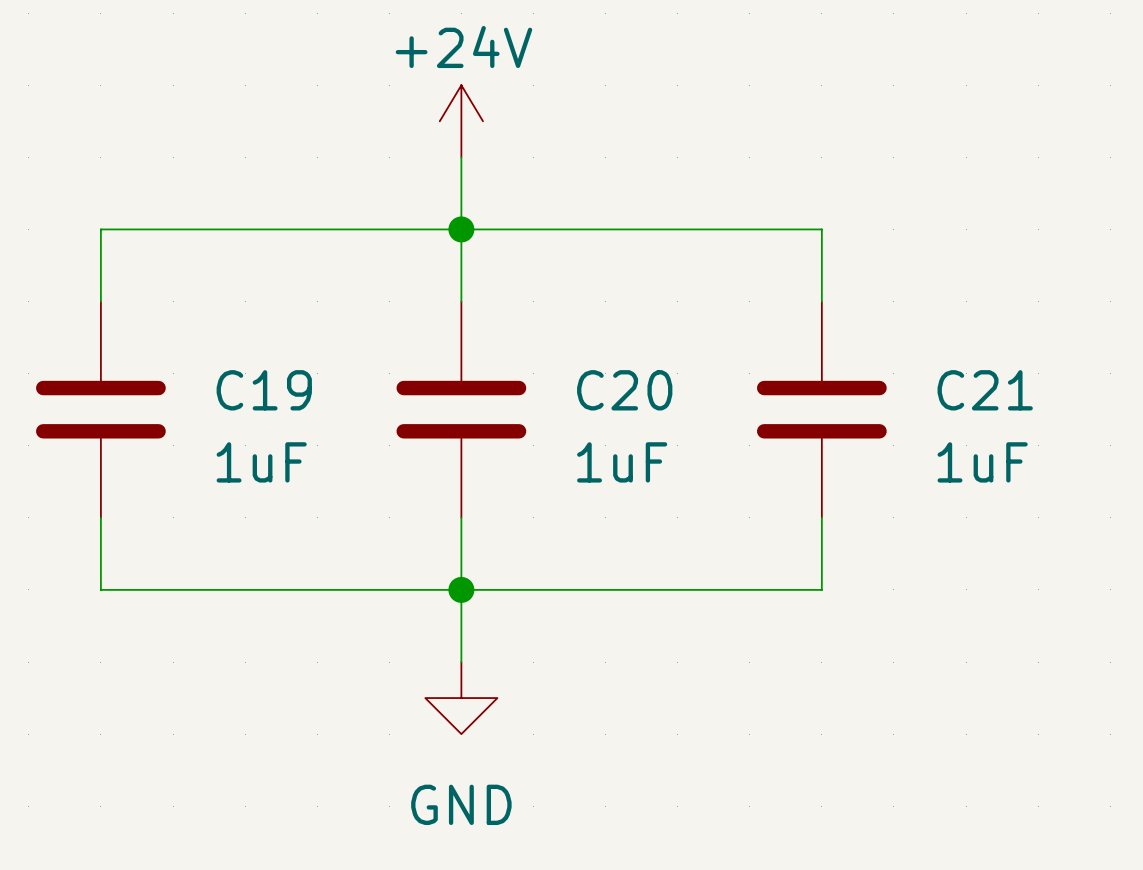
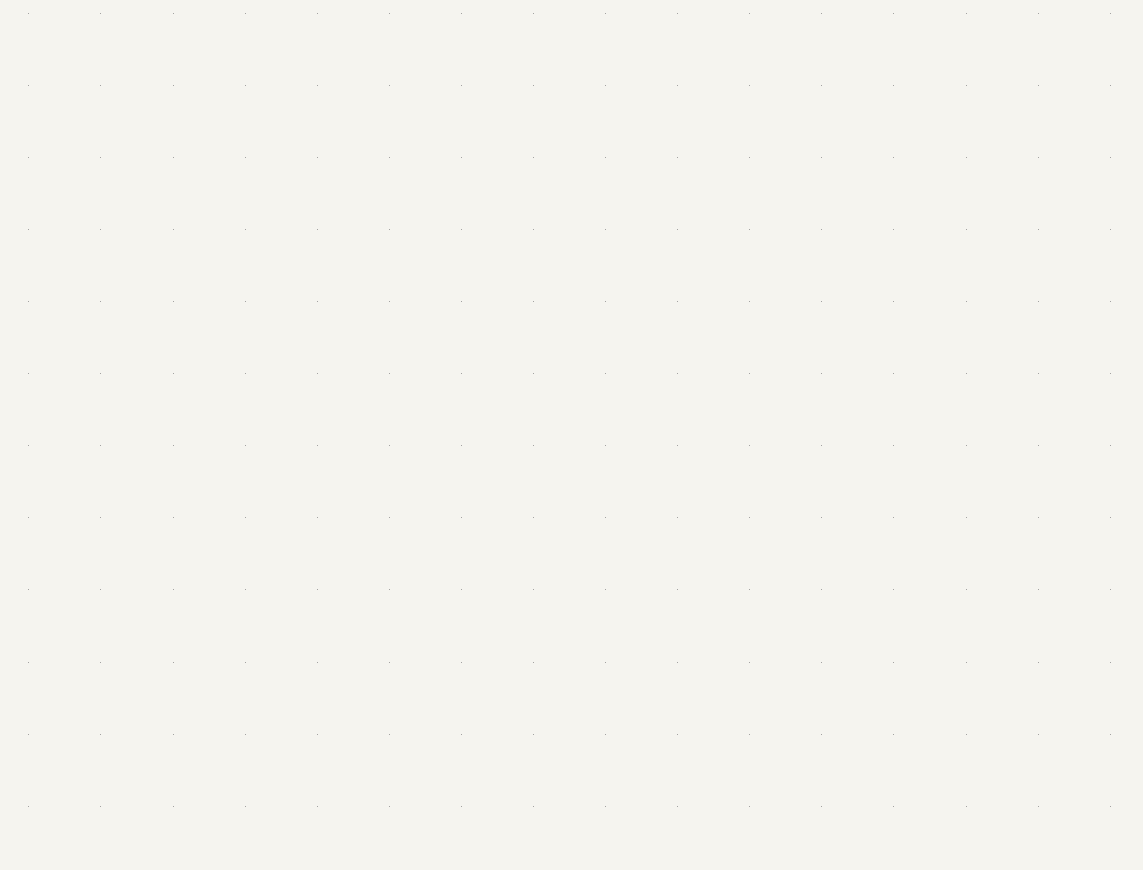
power symbol: +24V (461, 121) -> none
wire: (461, 157) (461, 301) -> none
junction: (461, 229) -> none
wire: (100, 301) (100, 229) (821, 229) (821, 301) -> none
C19: 1uF (100, 409) -> none
C20: 1uF (461, 409) -> none
C21: 1uF (821, 409) -> none
wire: (100, 517) (100, 589) (821, 589) (821, 517) -> none
wire: (461, 517) (461, 662) -> none
junction: (461, 589) -> none
power symbol: GND (461, 698) -> none

